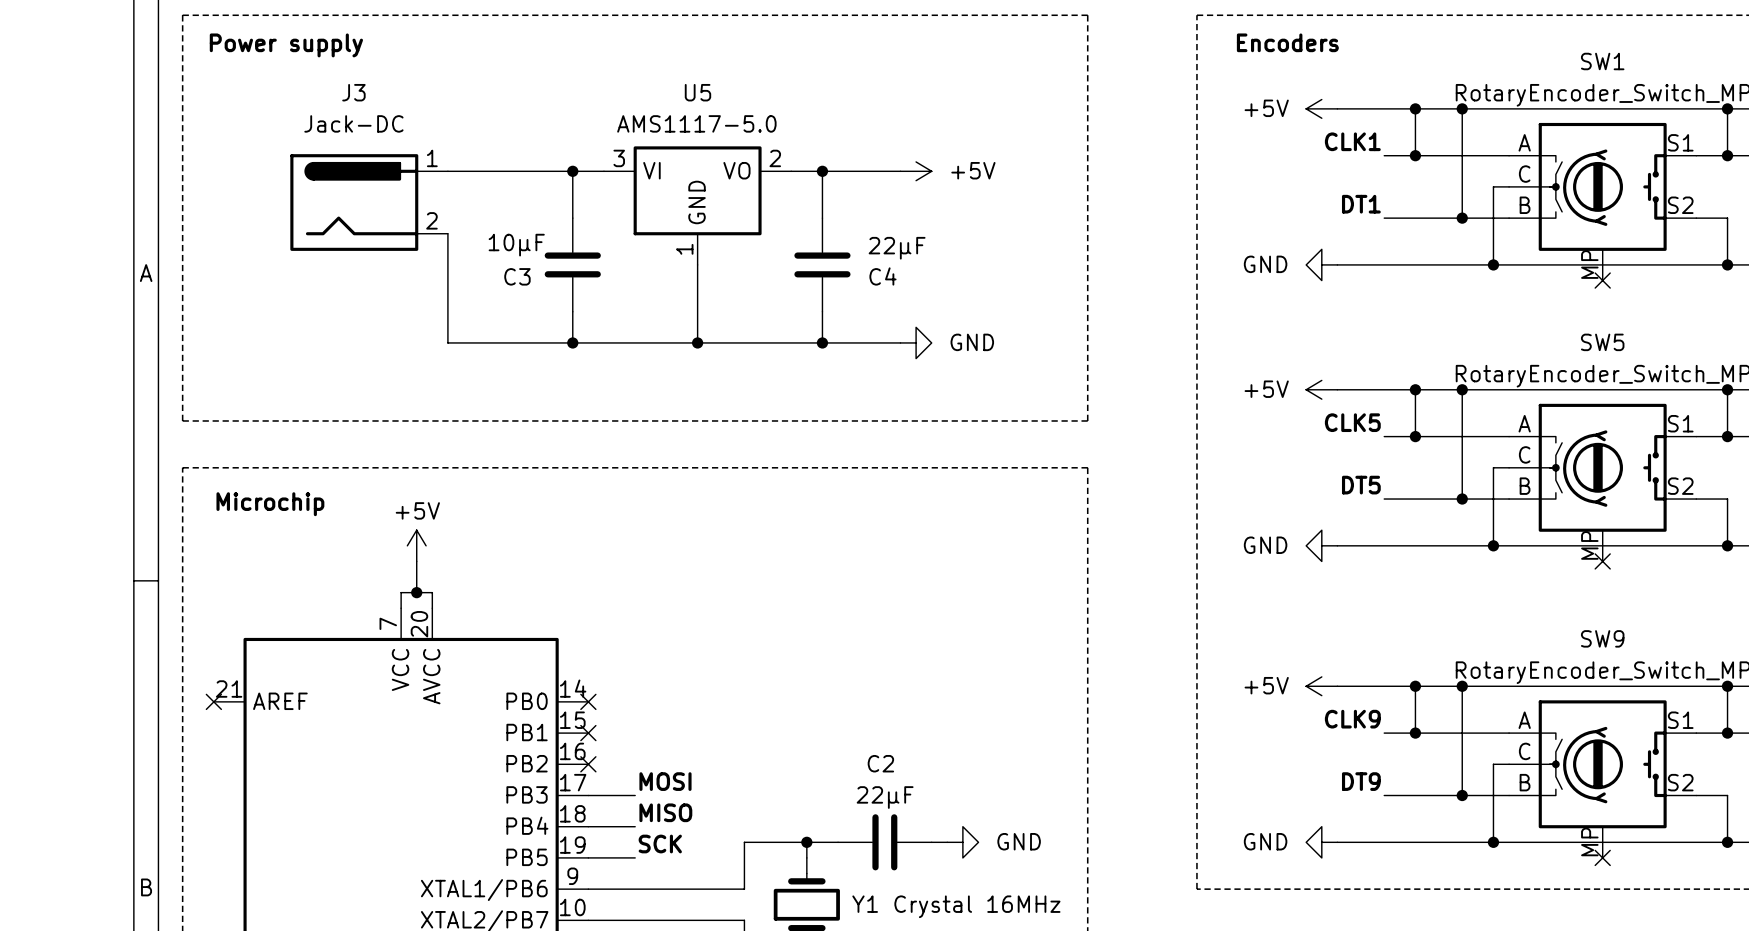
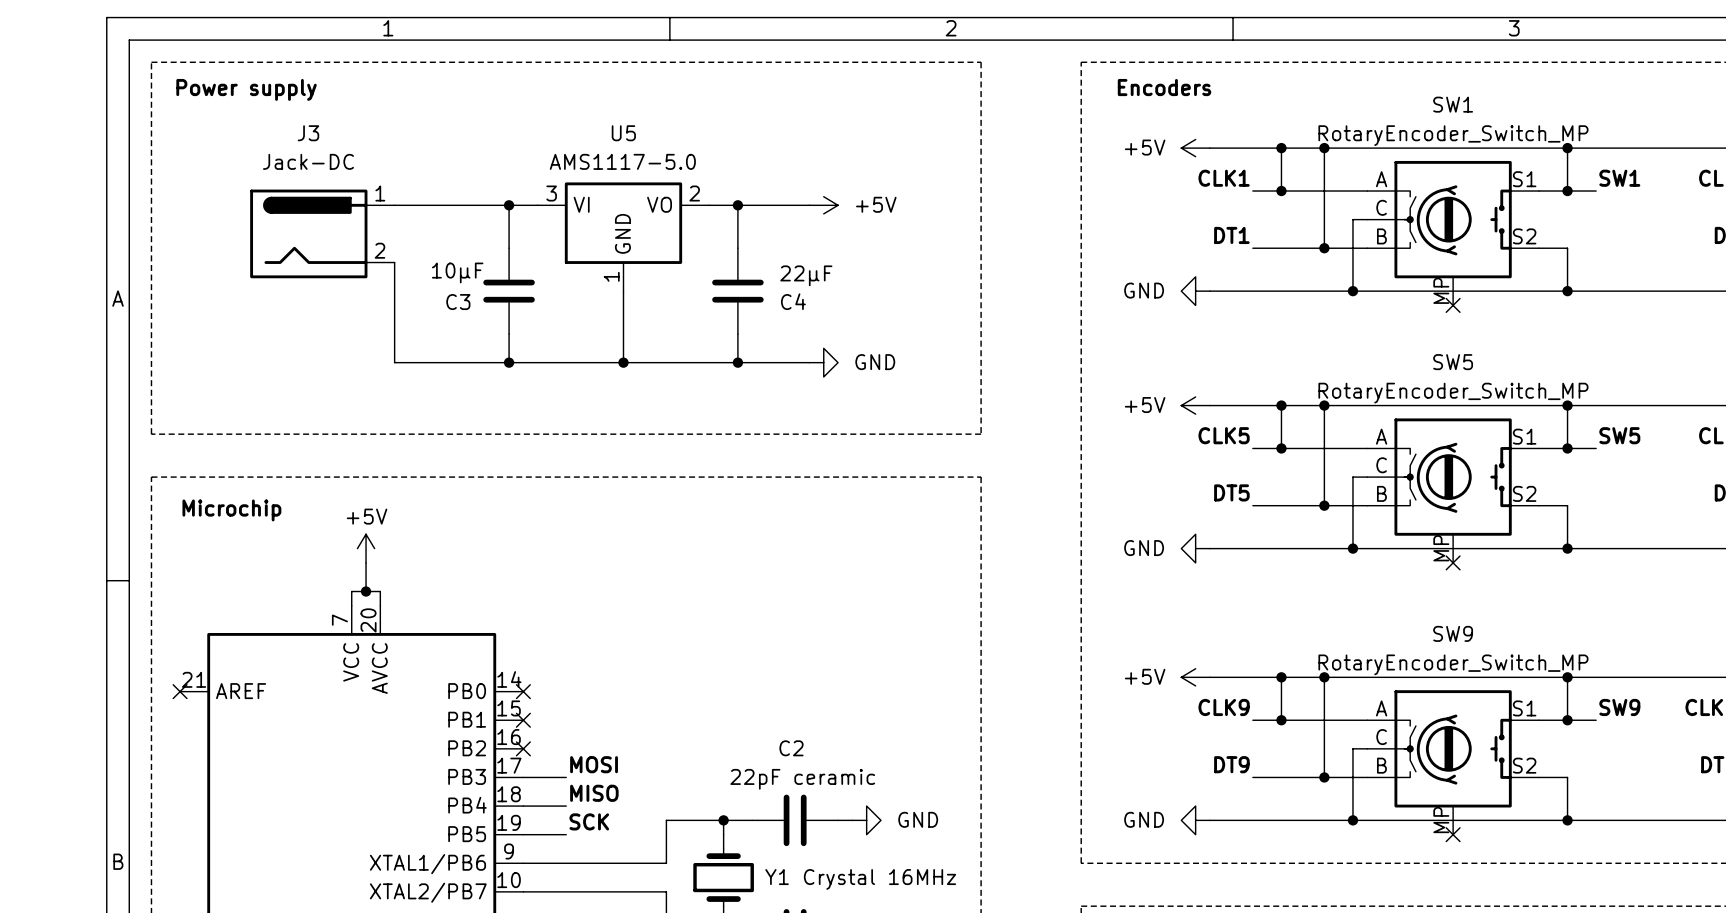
C2 value: 22μF (885, 797) -> 22pF ceramic (802, 779)

